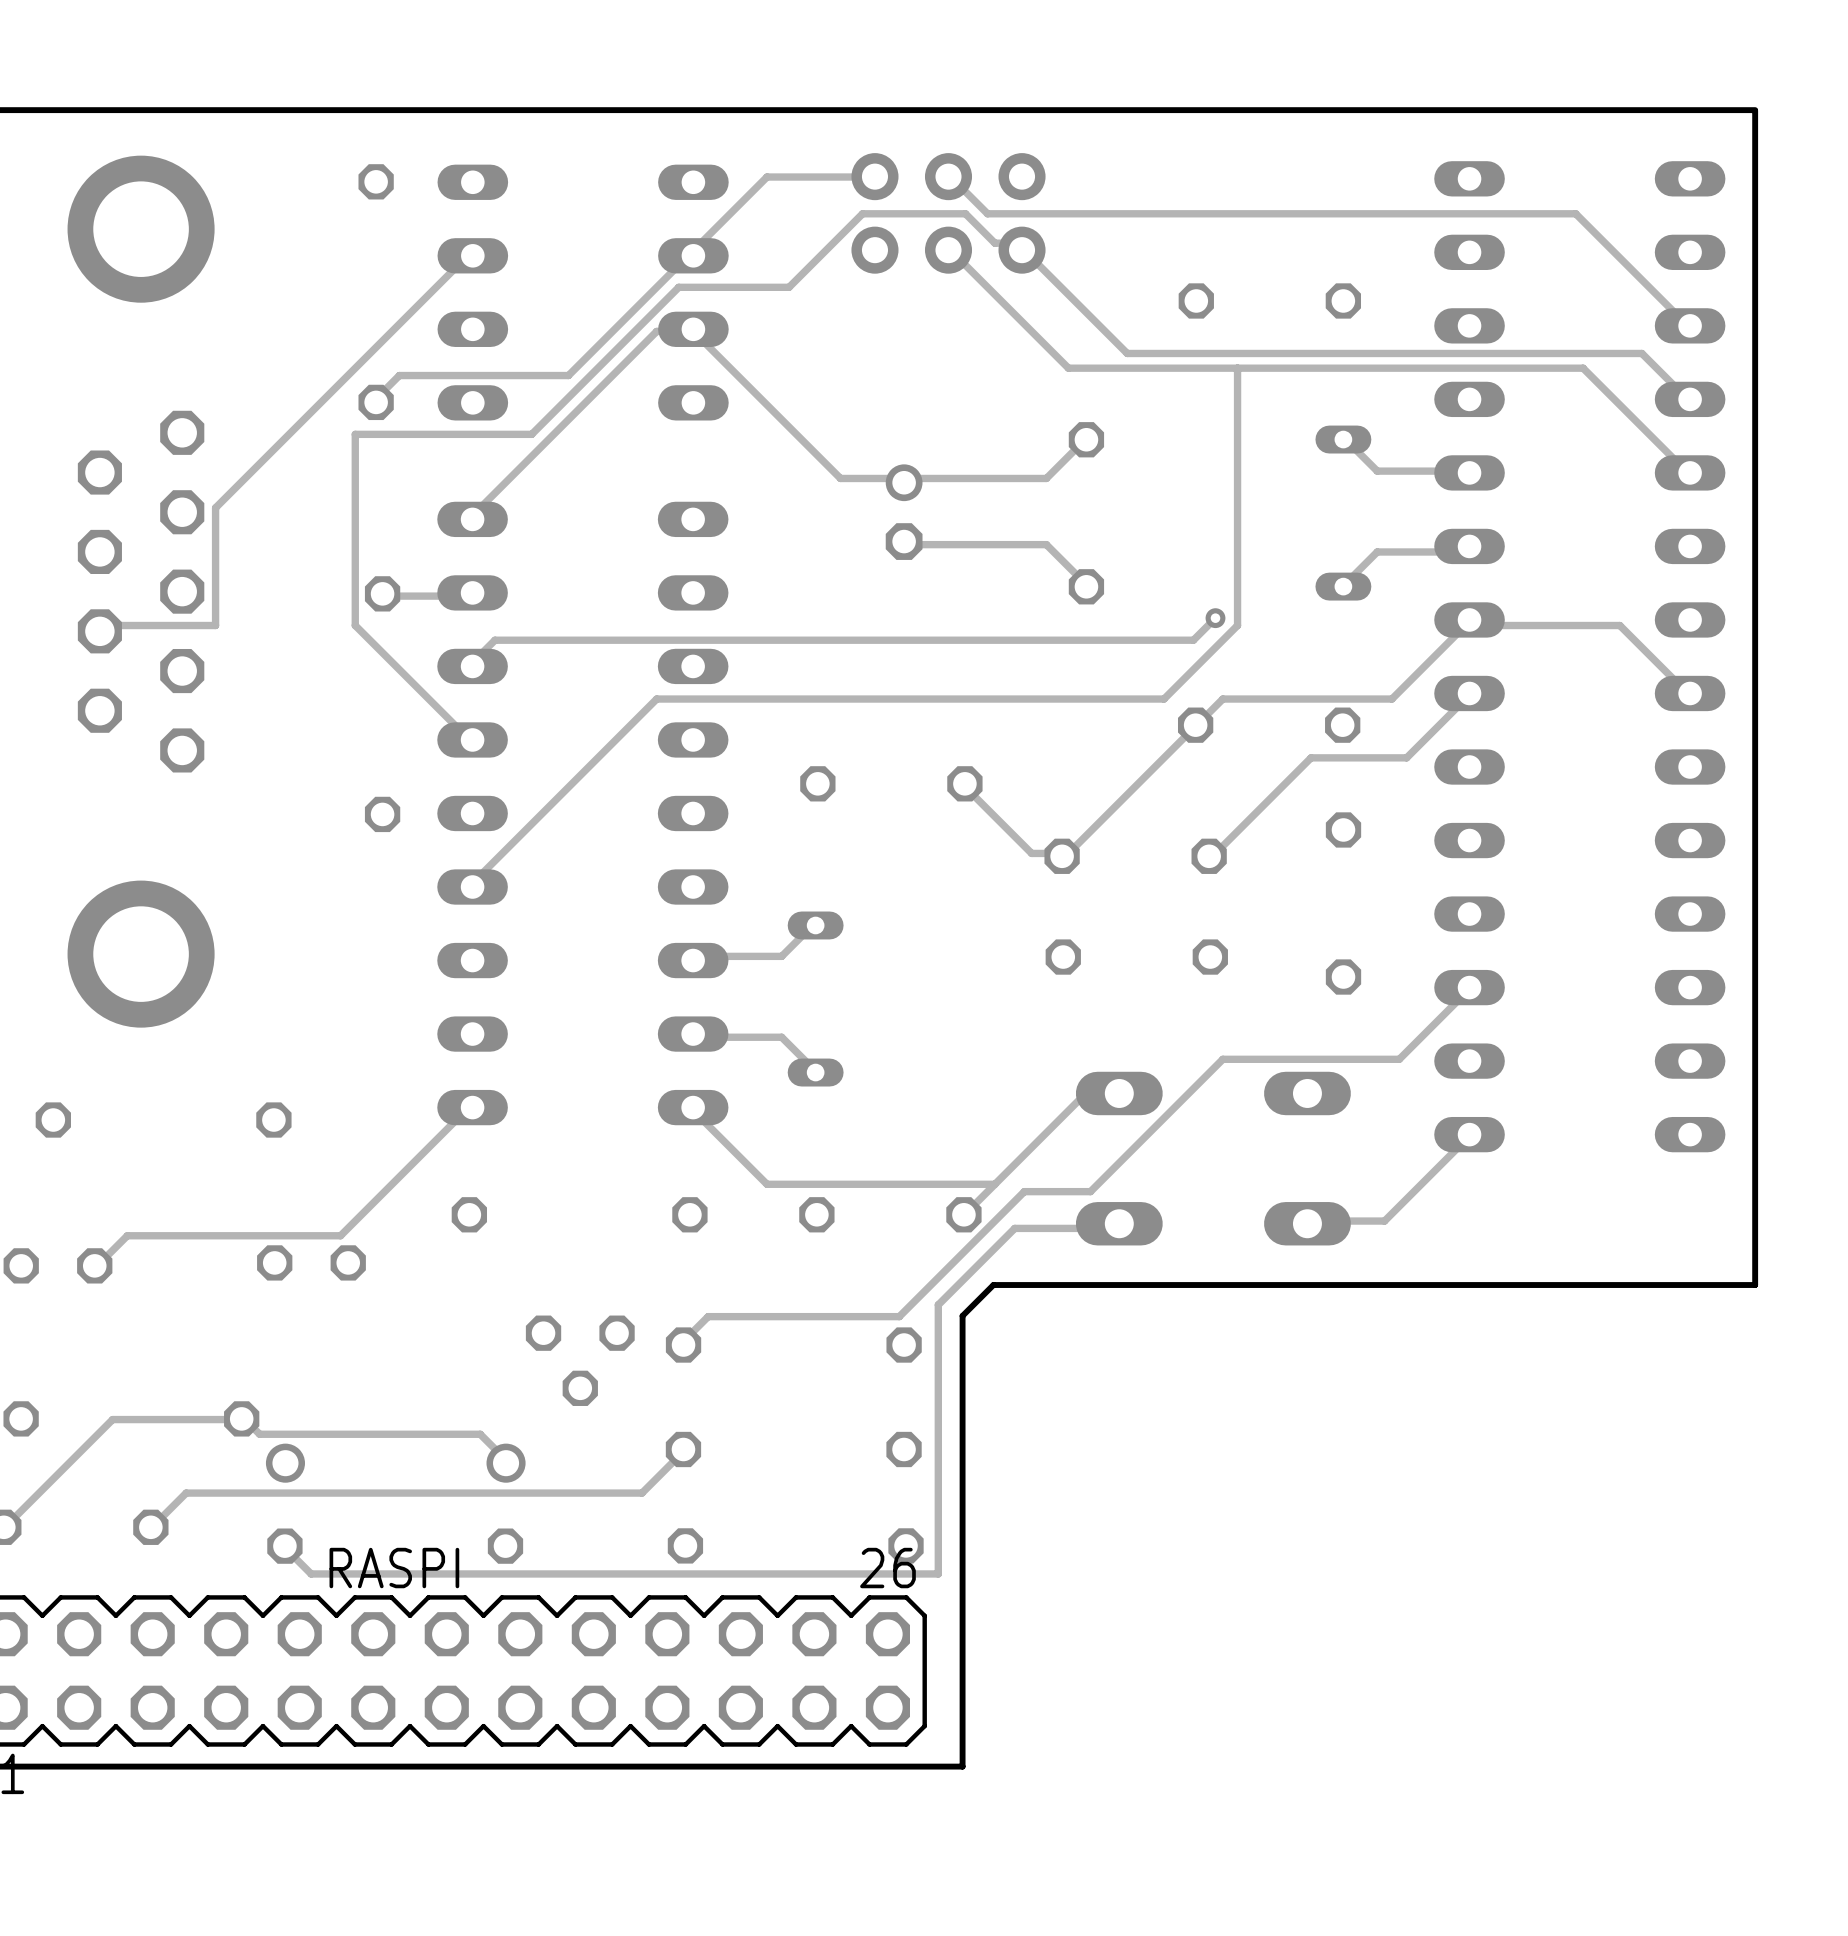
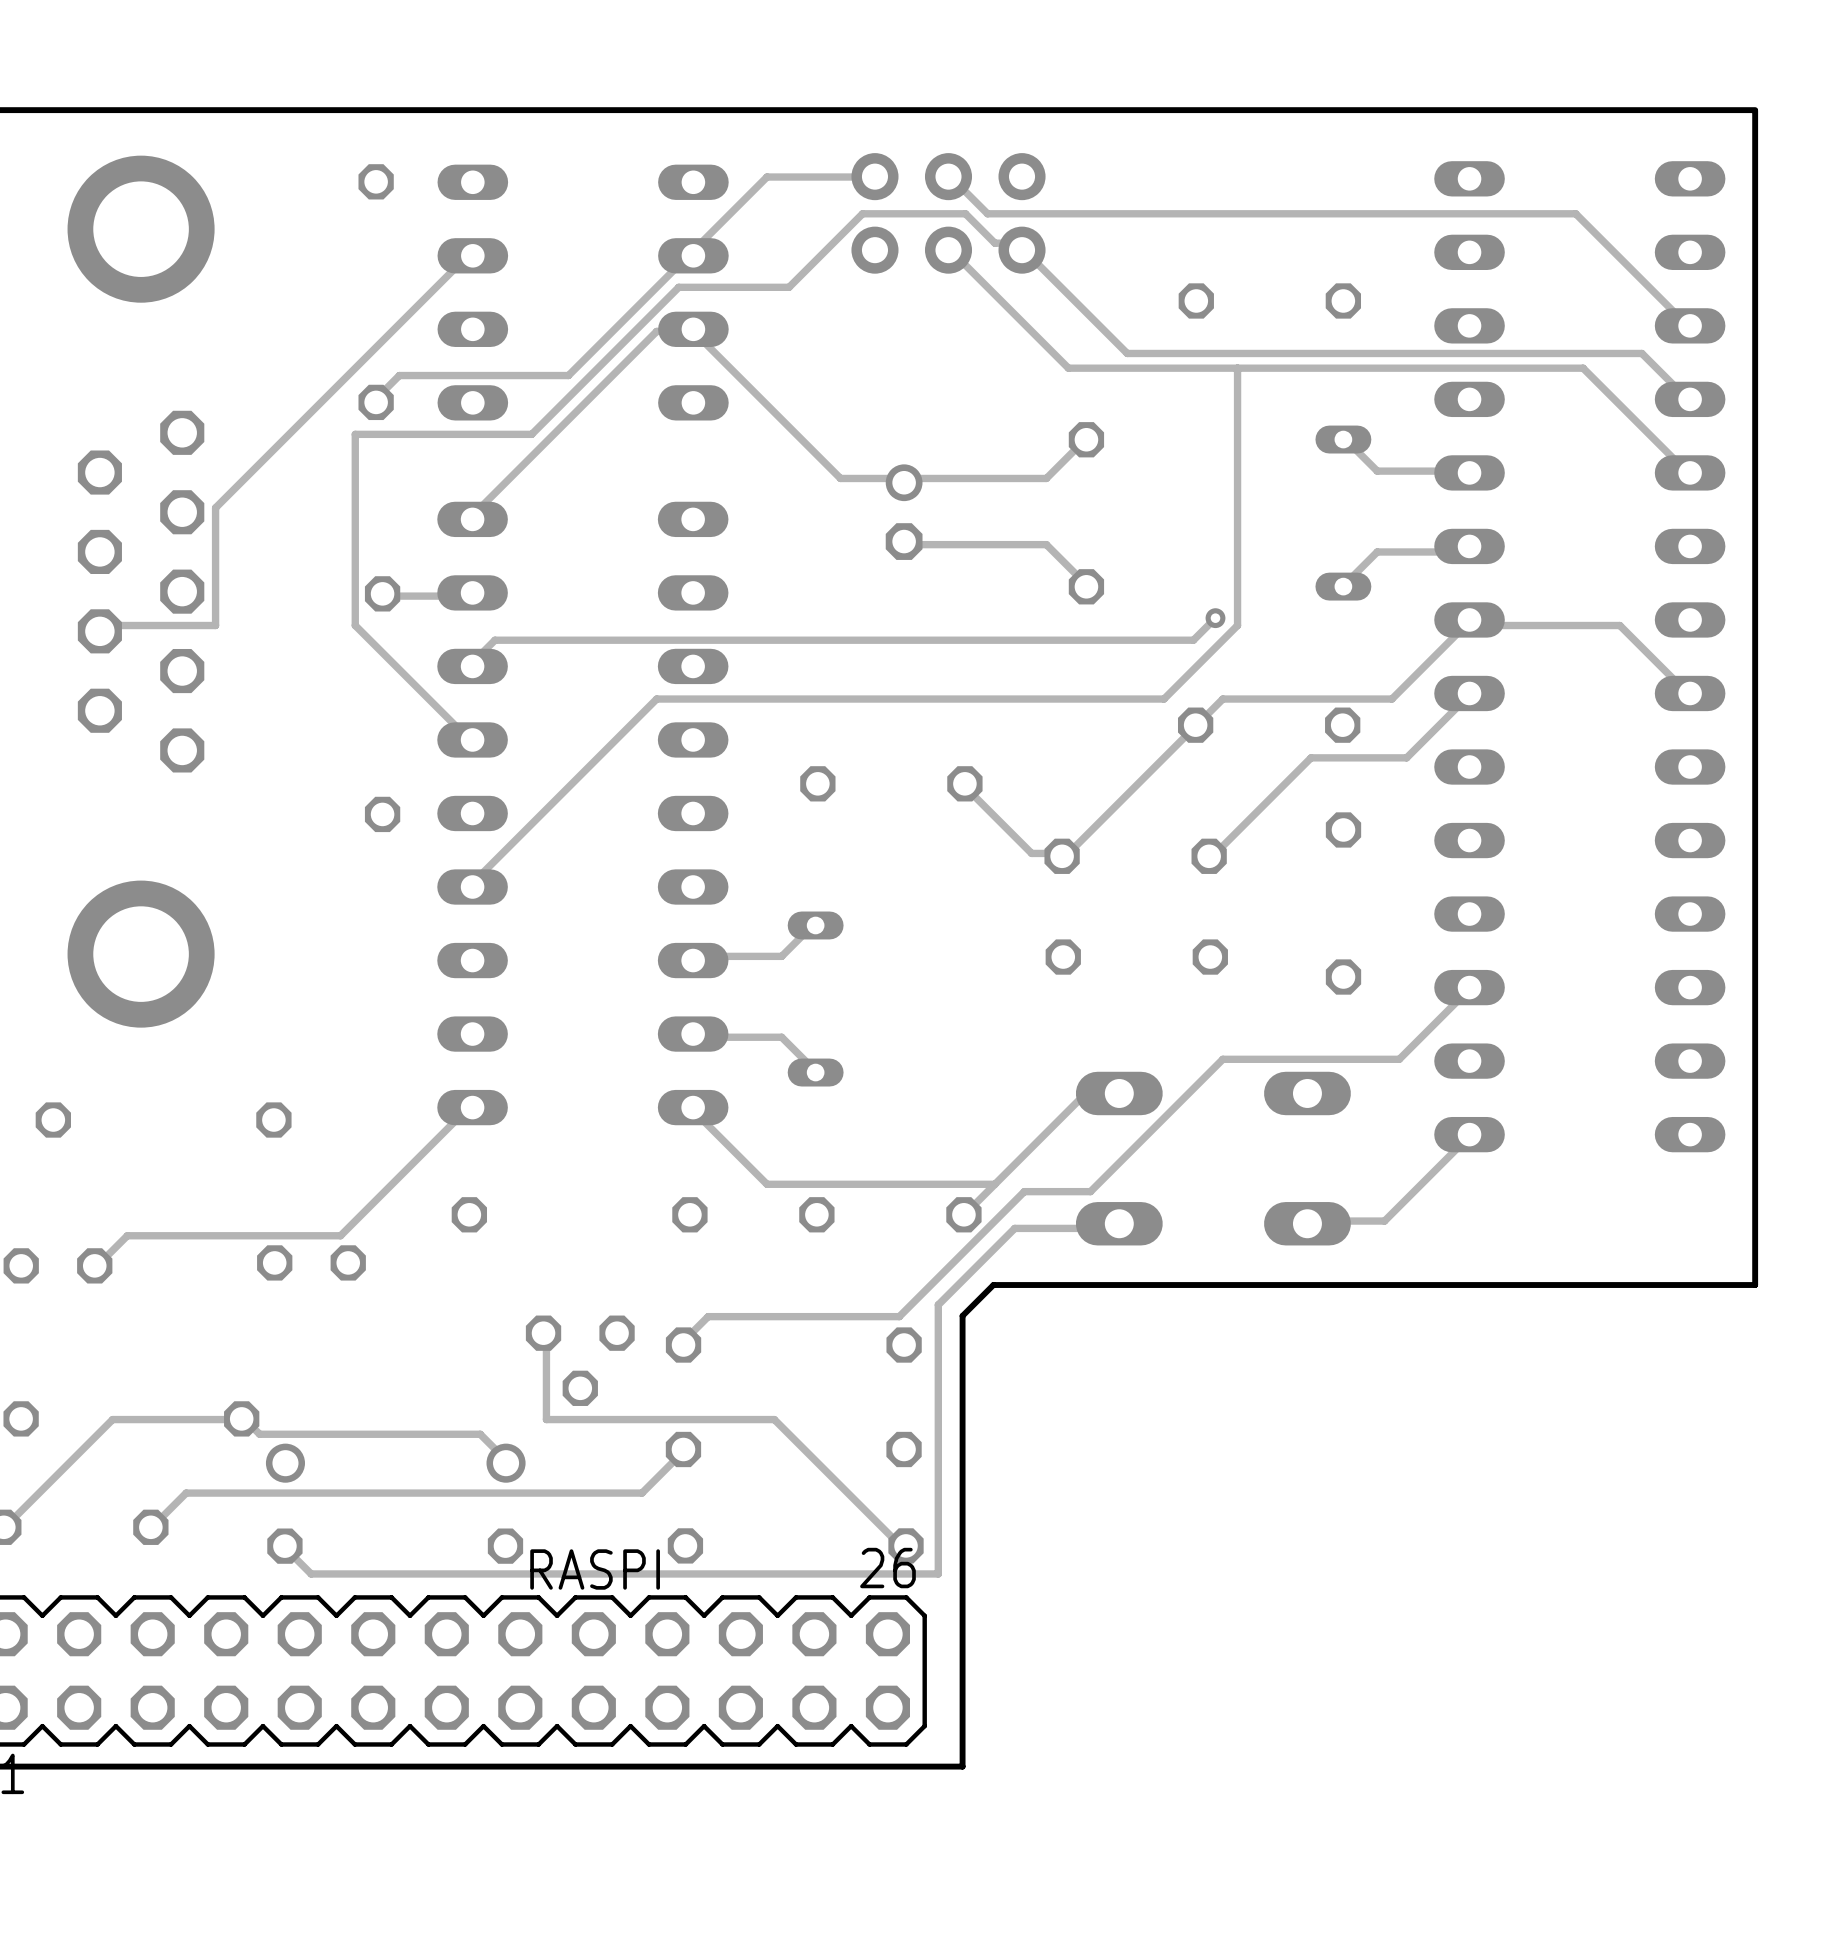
track: none -> (543, 1333) (546, 1338) (546, 1419) (774, 1419) (899, 1544) (906, 1545)
RASPI name position: RASPI (394, 1568) -> RASPI (595, 1569)

